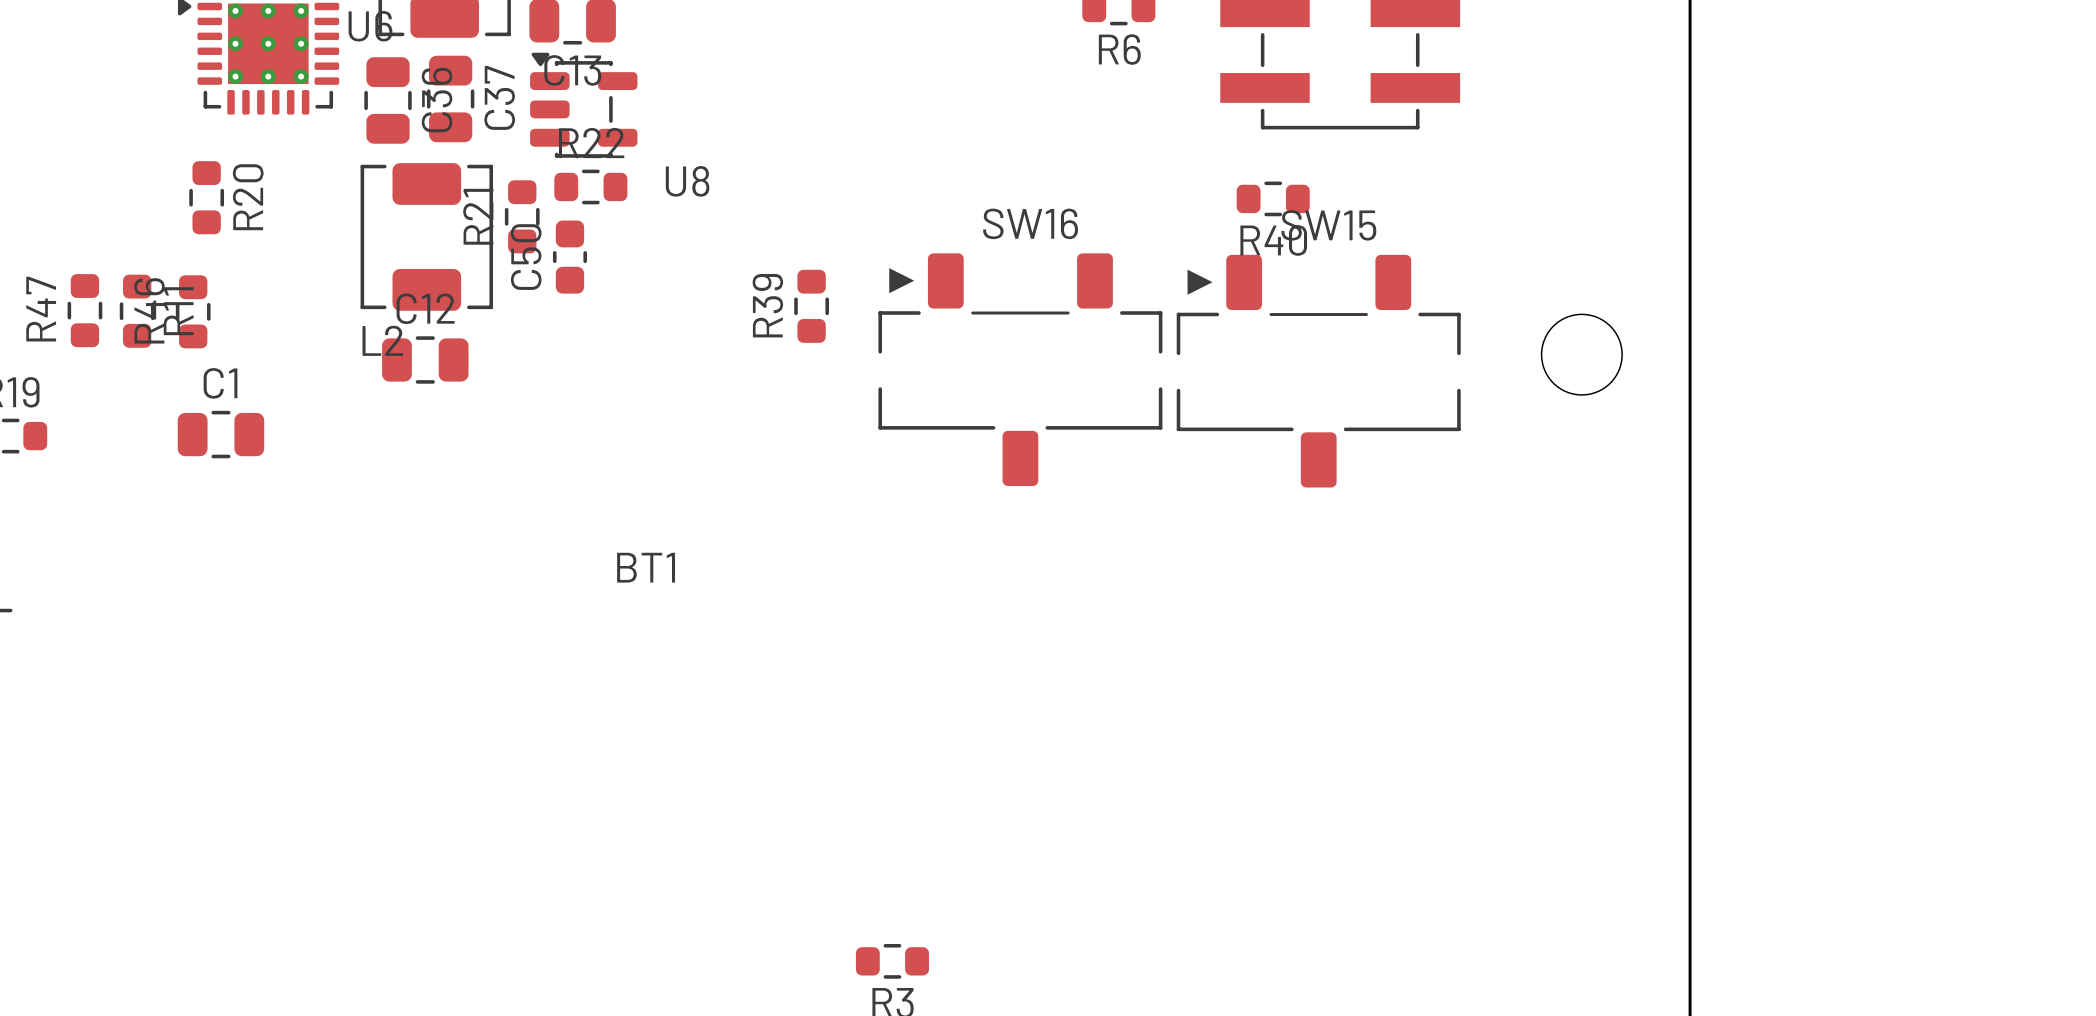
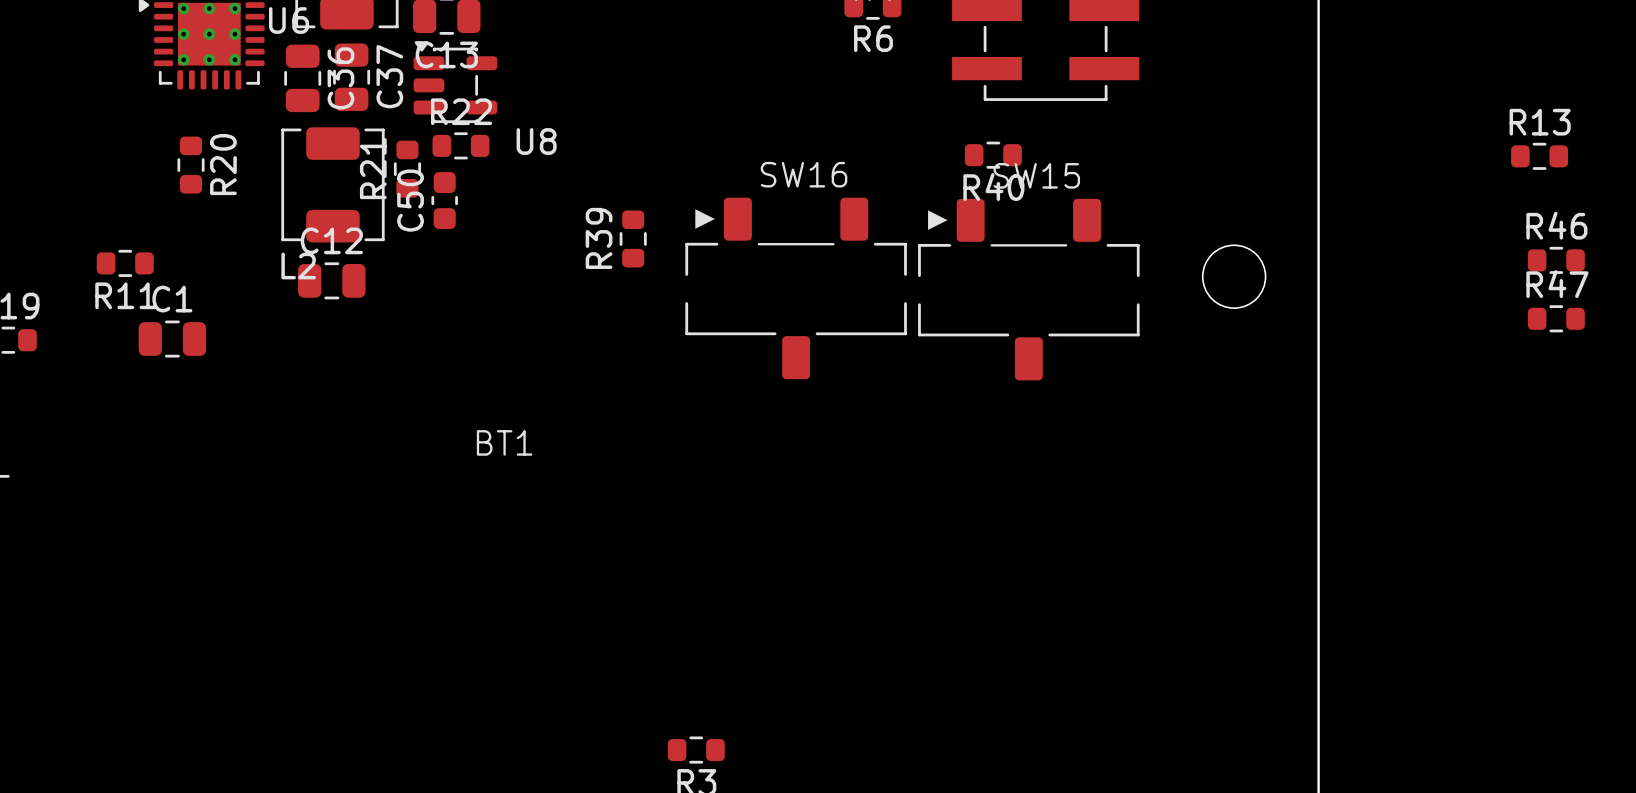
R20 position: (206, 197) -> (191, 165)
R13: none -> (1539, 156)
R47 rotation: 0° (84, 310) -> 90° clockwise (1556, 318)
R47 position: (84, 310) -> (1556, 318)
R11 rotation: 0° (137, 311) -> 90° clockwise (125, 263)
R46 rotation: 0° (193, 311) -> 90° clockwise (1556, 260)
R46 position: (193, 311) -> (1556, 260)

